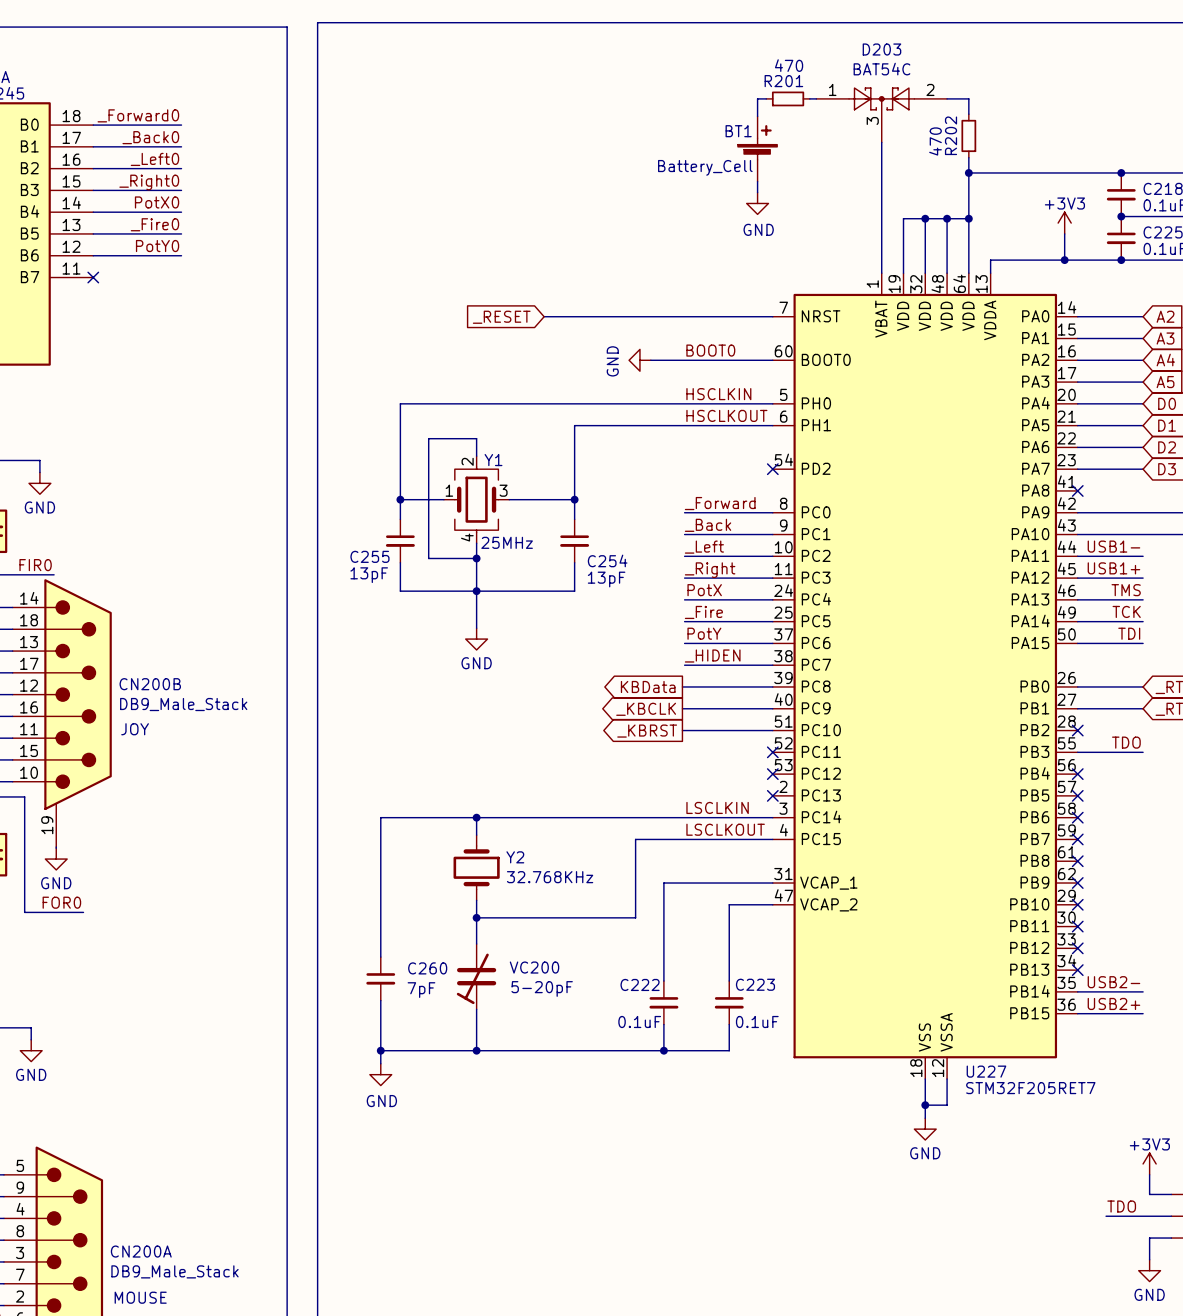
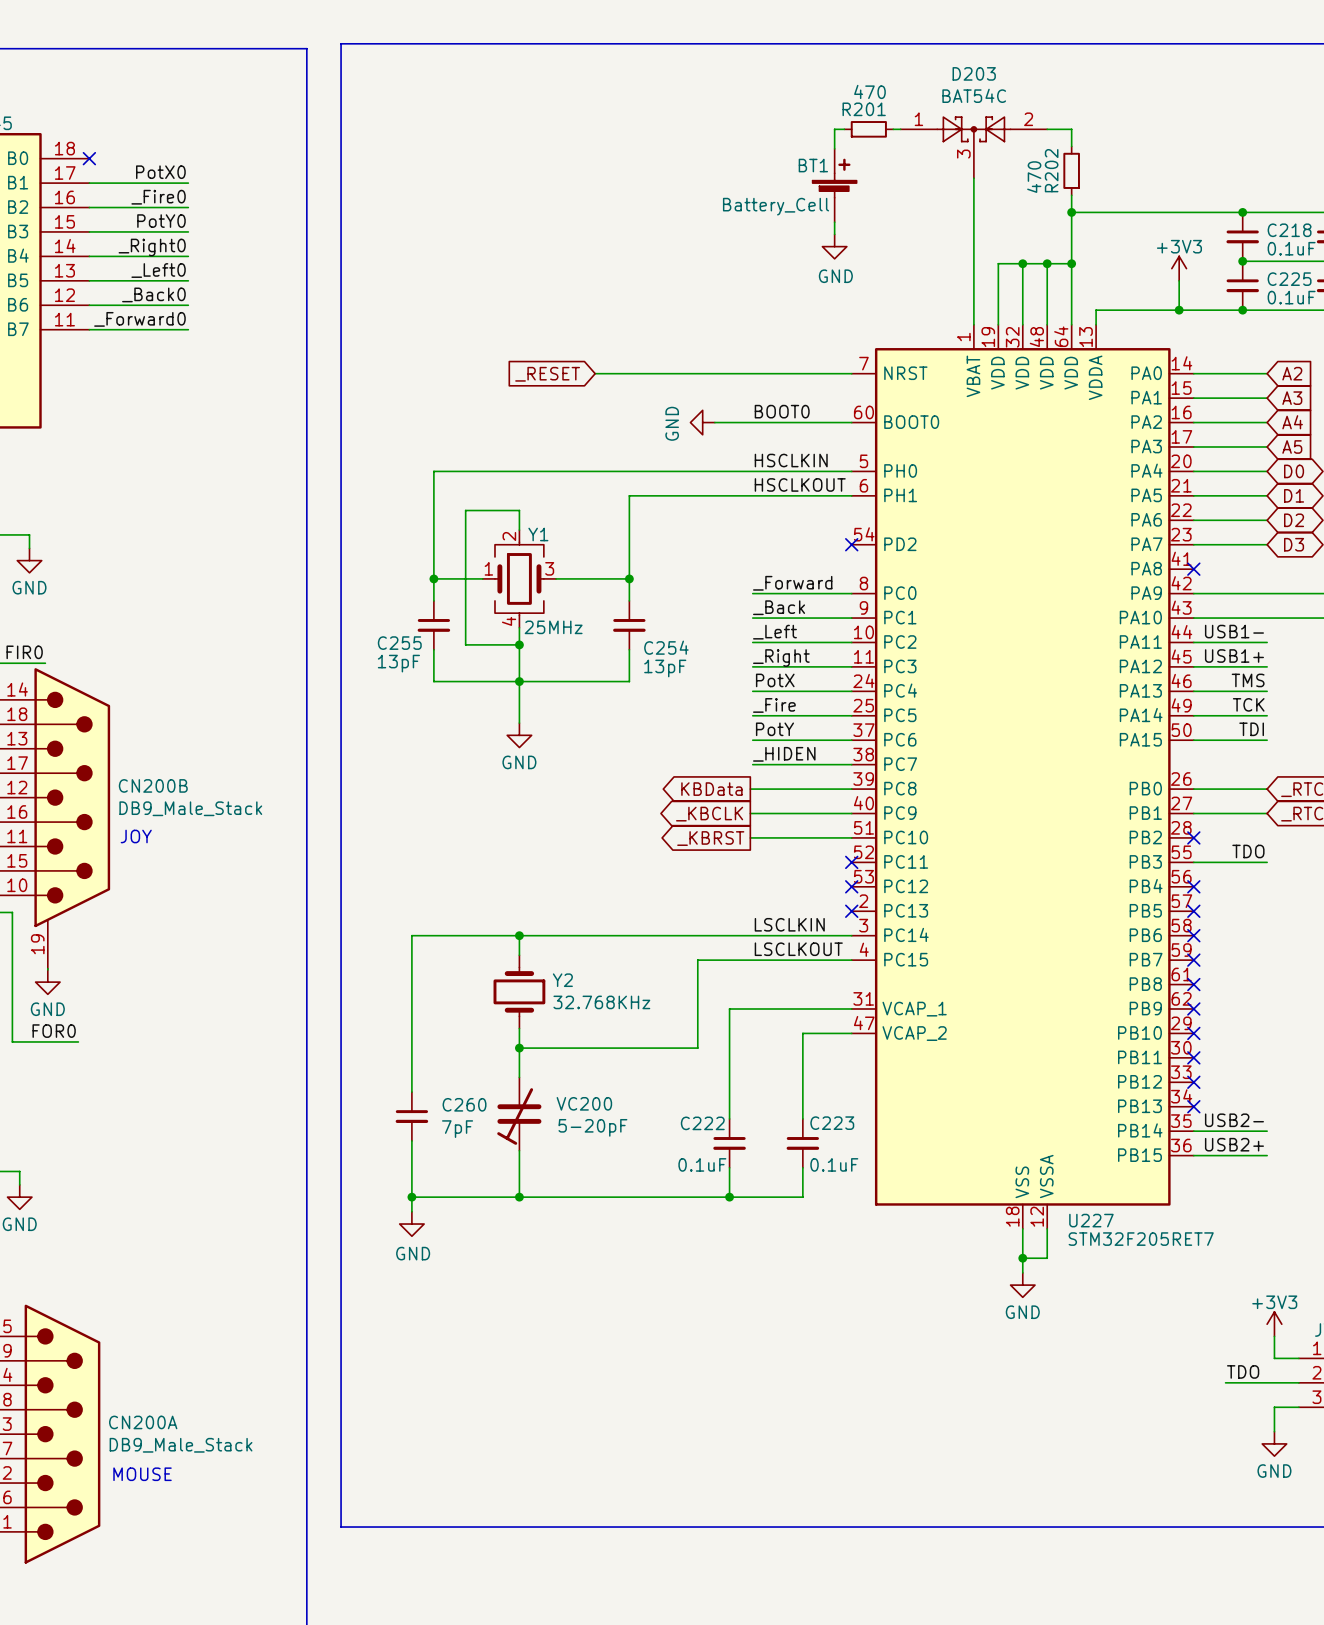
label position: _Forward0 (138, 115) -> _Forward0 (139, 319)
wire: (93, 125) (181, 125) -> (89, 329) (188, 329)
no-connect mark: none -> (89, 158)
label: _Back0 (150, 137) -> PotX0 (160, 172)
label: _Left0 (154, 159) -> _Fire0 (158, 197)
label: _Right0 (149, 182) -> PotY0 (161, 221)
label: PotX0 (157, 202) -> _Right0 (152, 247)
label: _Fire0 (154, 224) -> _Left0 (158, 270)
label: PotY0 (157, 246) -> _Back0 (153, 294)
no-connect mark: (93, 277) -> none

